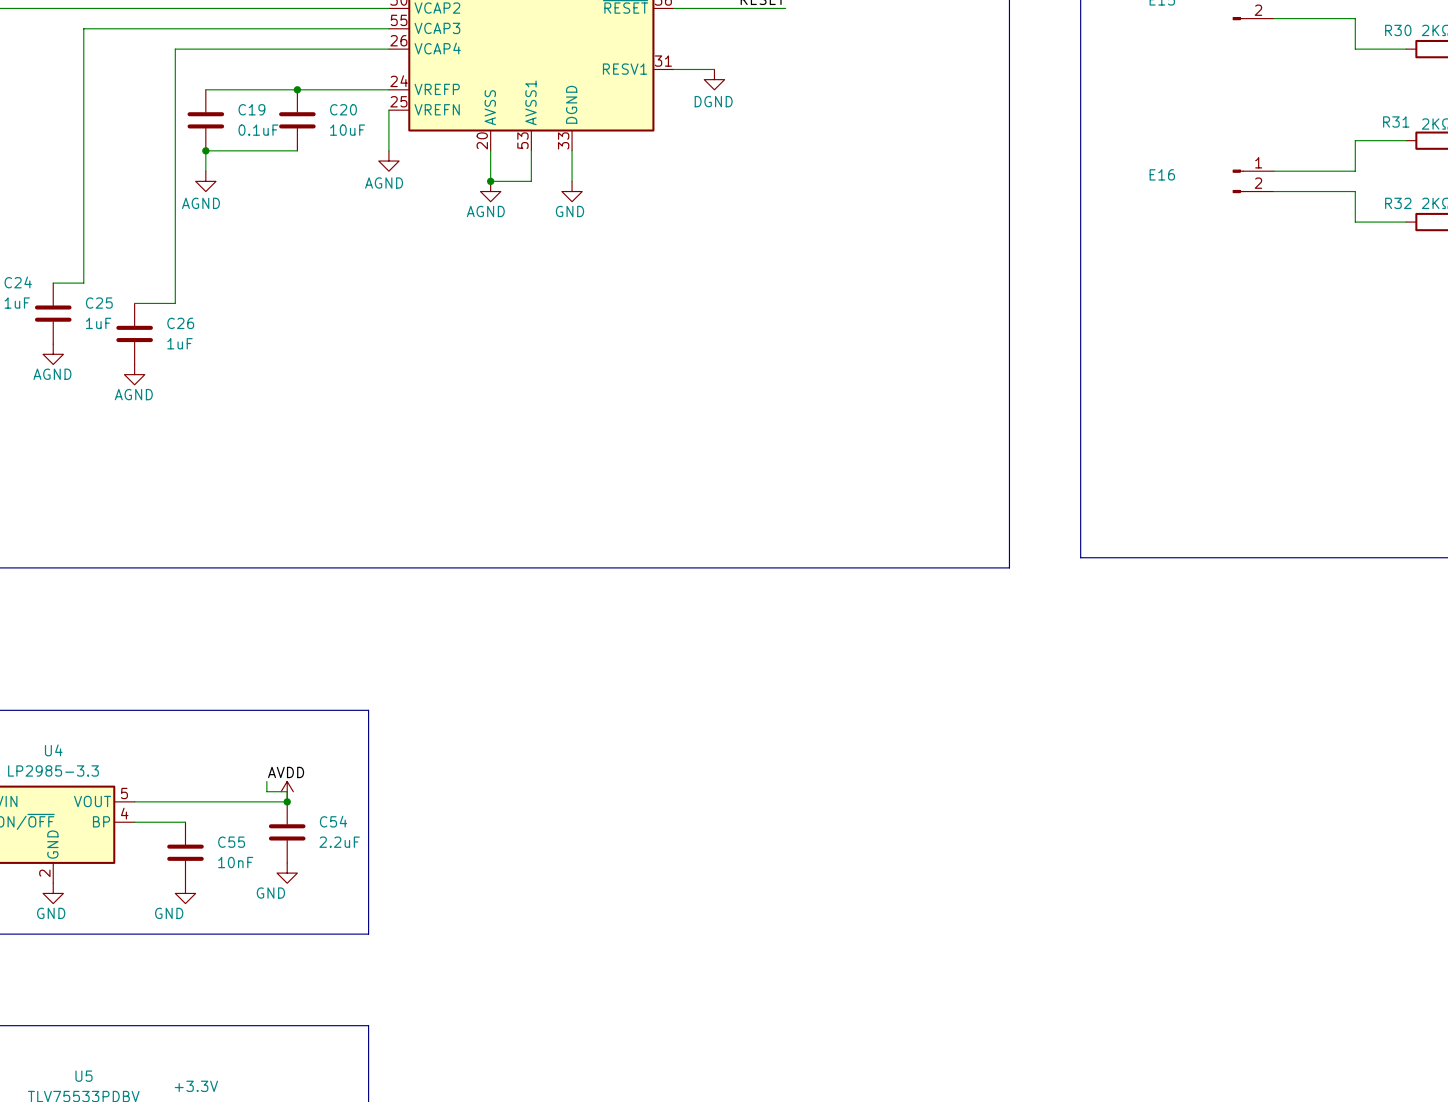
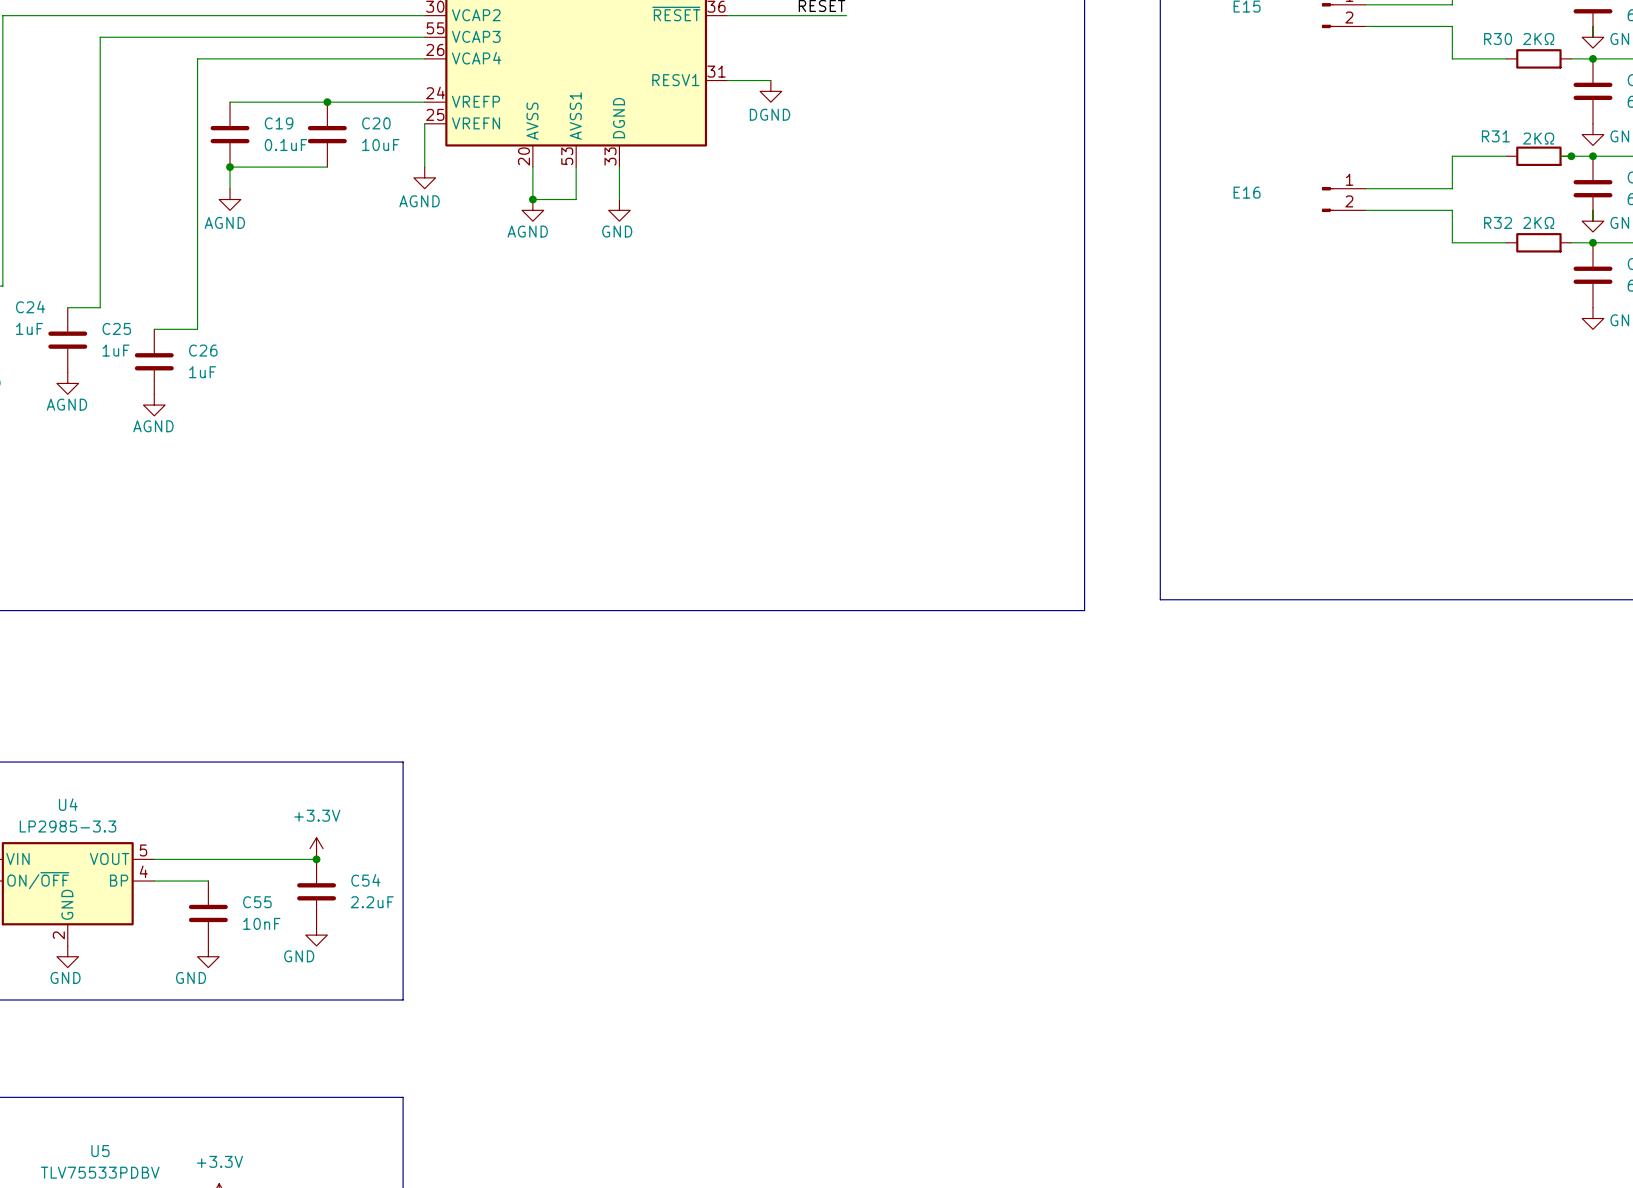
power symbol text: none -> +3.3V (317, 815)
label: AVDD (286, 772) -> none
wire: (266, 781) (266, 791) (287, 791) (287, 801) -> none

